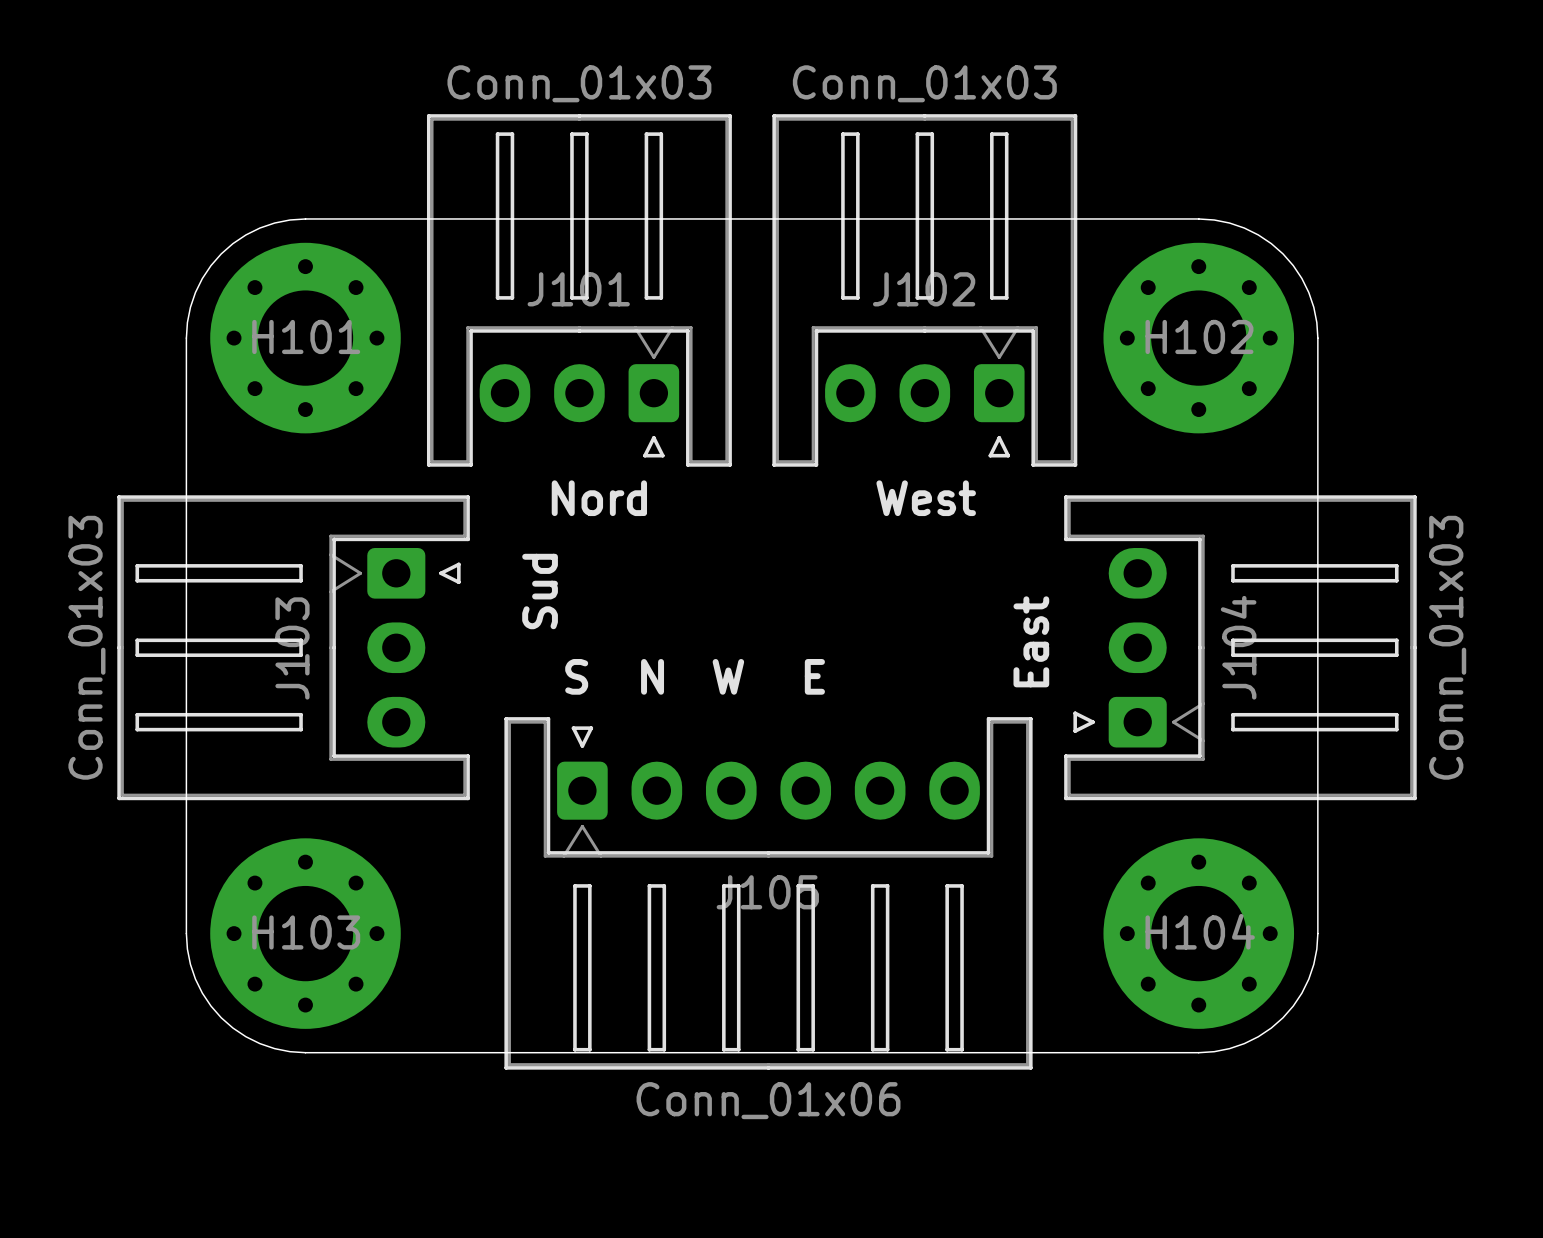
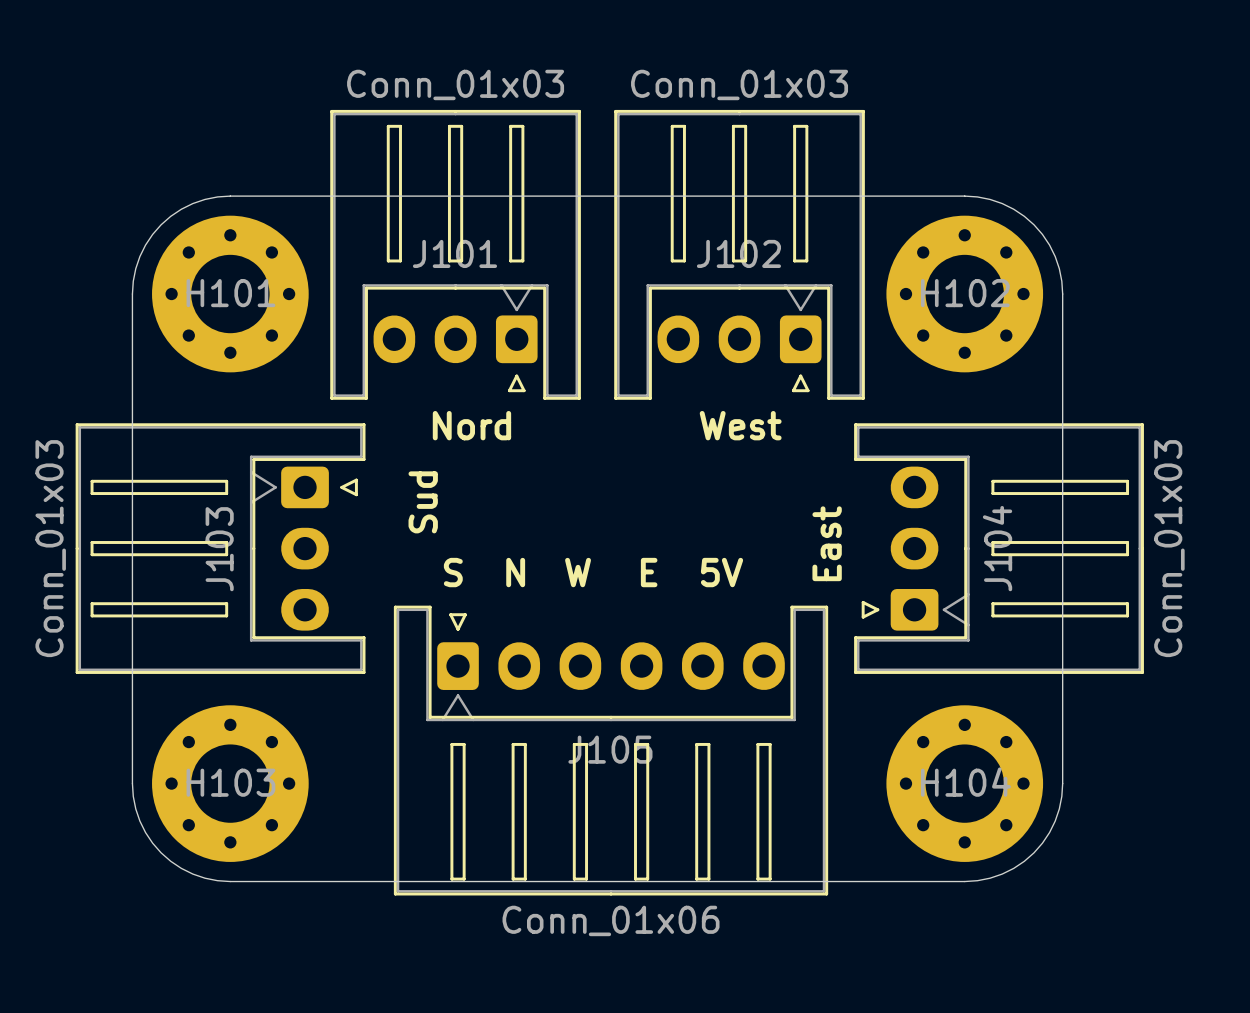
text: none -> 5V (722, 572)

